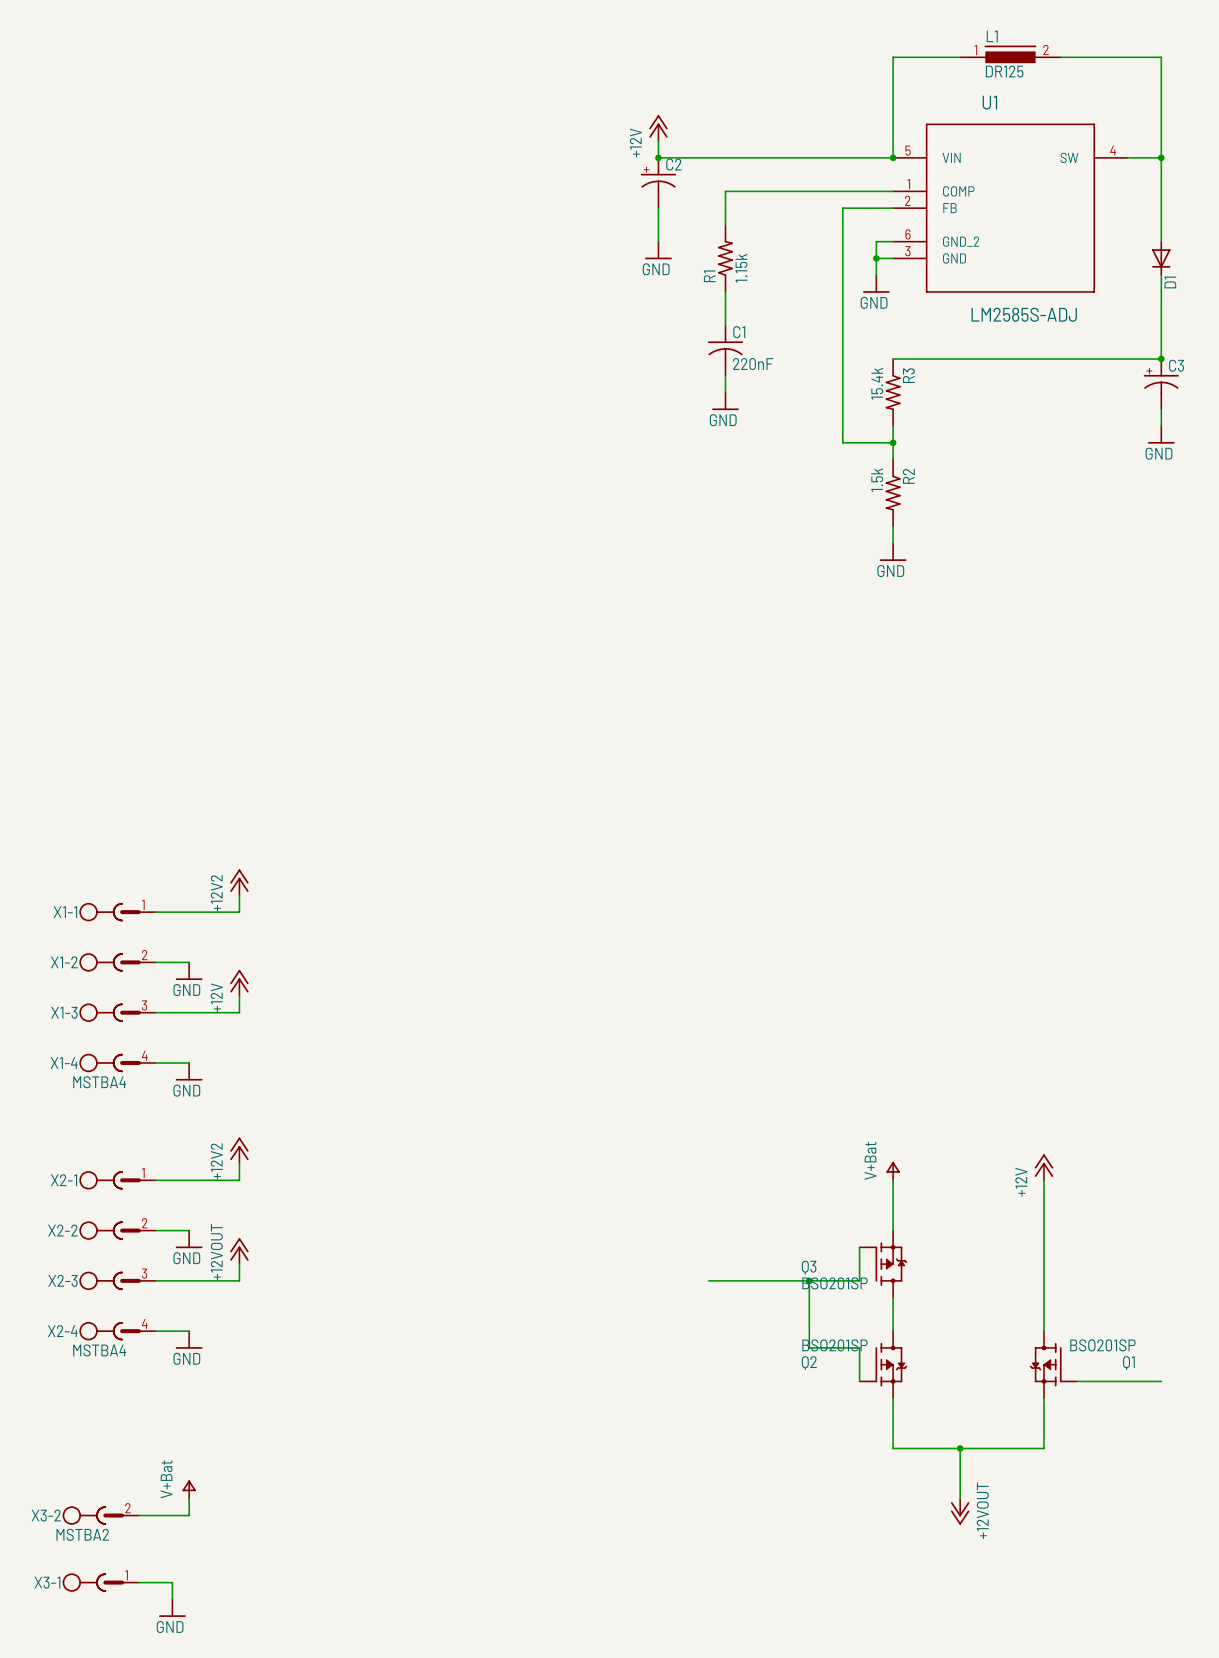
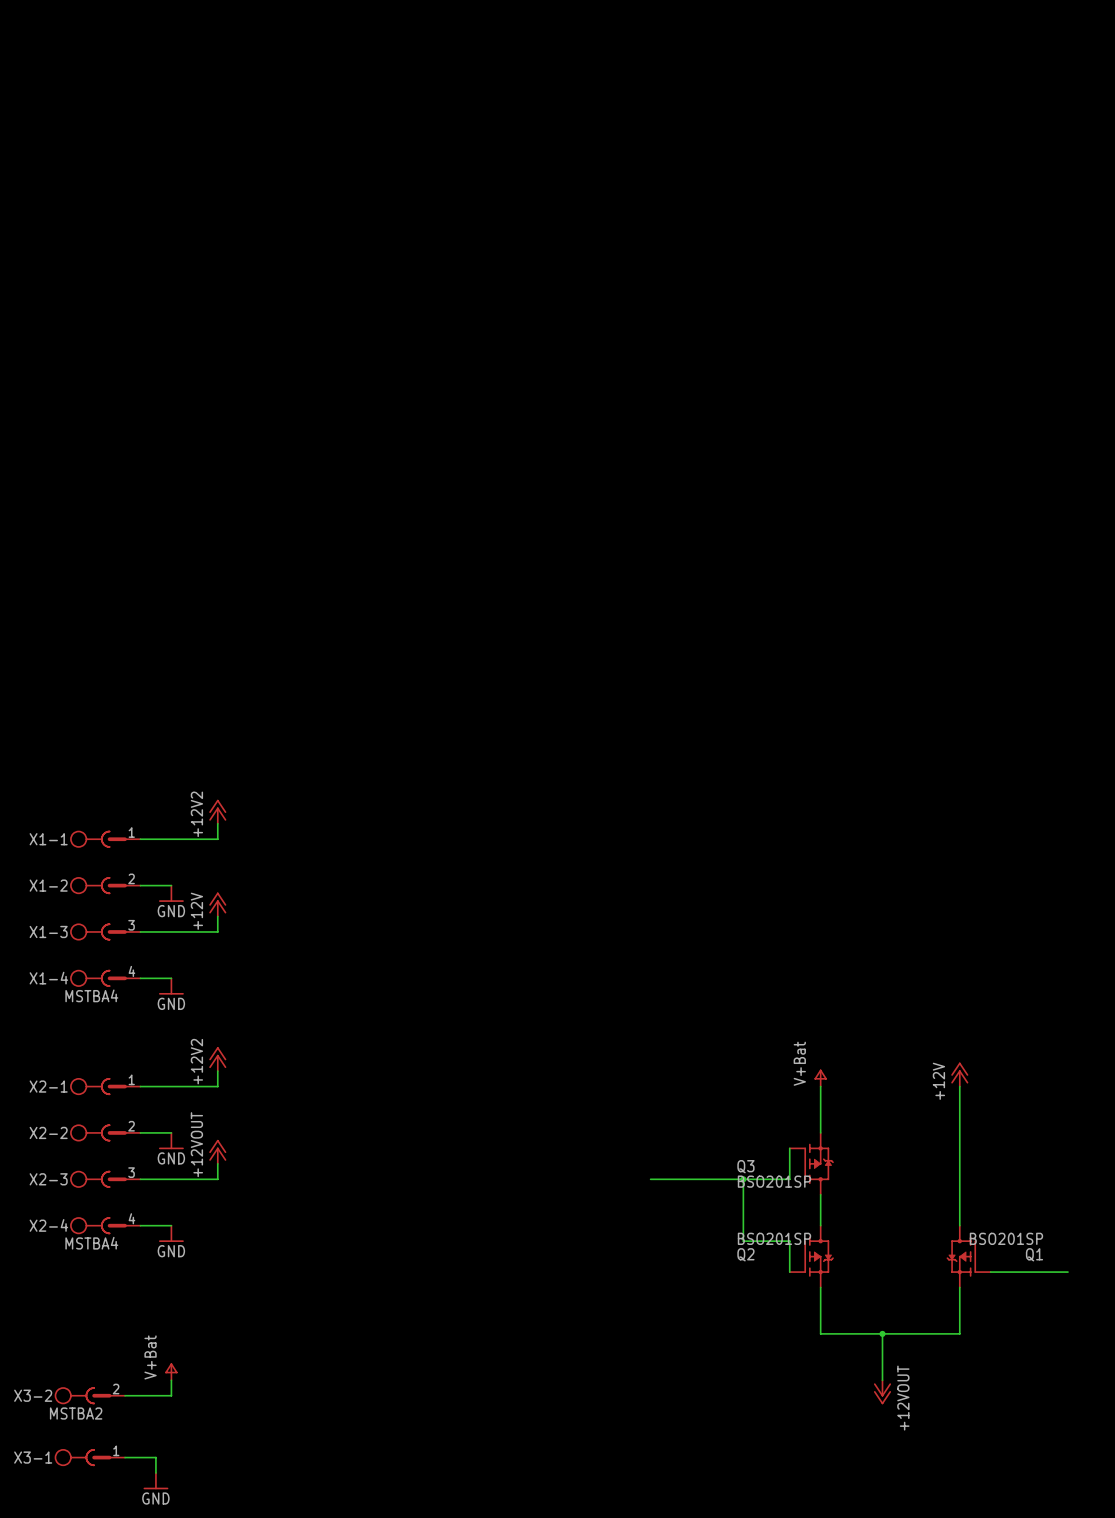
L1: DR125 (1010, 54) -> none
wire: (960, 57) (893, 57) (893, 157) (658, 157) (658, 141) -> none
wire: (1060, 57) (1161, 57) (1161, 241) -> none
power symbol: +12V (658, 128) -> none
junction: (658, 157) -> none
junction: (893, 157) -> none
wire: (1127, 157) (1161, 157) -> none
junction: (1161, 157) -> none
C2: (658, 183) -> none
wire: (893, 191) (725, 191) (725, 224) -> none
wire: (658, 208) (658, 241) -> none
wire: (893, 208) (842, 208) (842, 442) (893, 442) -> none
U1: LM2585S-ADJ (1010, 208) -> none
wire: (893, 241) (876, 241) (876, 275) -> none
power symbol: GND (658, 250) -> none
R1: 1.15k (725, 258) -> none
wire: (876, 258) (893, 258) -> none
junction: (876, 258) -> none
D1: (1161, 258) -> none
wire: (1161, 275) (1161, 359) (893, 359) -> none
power symbol: GND (876, 283) -> none
wire: (725, 291) (725, 325) -> none
C1: 220nF (725, 350) -> none
junction: (1161, 359) -> none
wire: (725, 375) (725, 392) -> none
C3: (1161, 384) -> none
R3: 15.4k (893, 392) -> none
power symbol: GND (725, 401) -> none
wire: (1161, 409) (1161, 426) -> none
wire: (893, 426) (893, 459) -> none
power symbol: GND (1161, 434) -> none
junction: (893, 442) -> none
R2: 1.5k (893, 493) -> none
wire: (893, 526) (893, 543) -> none
power symbol: GND (893, 552) -> none

